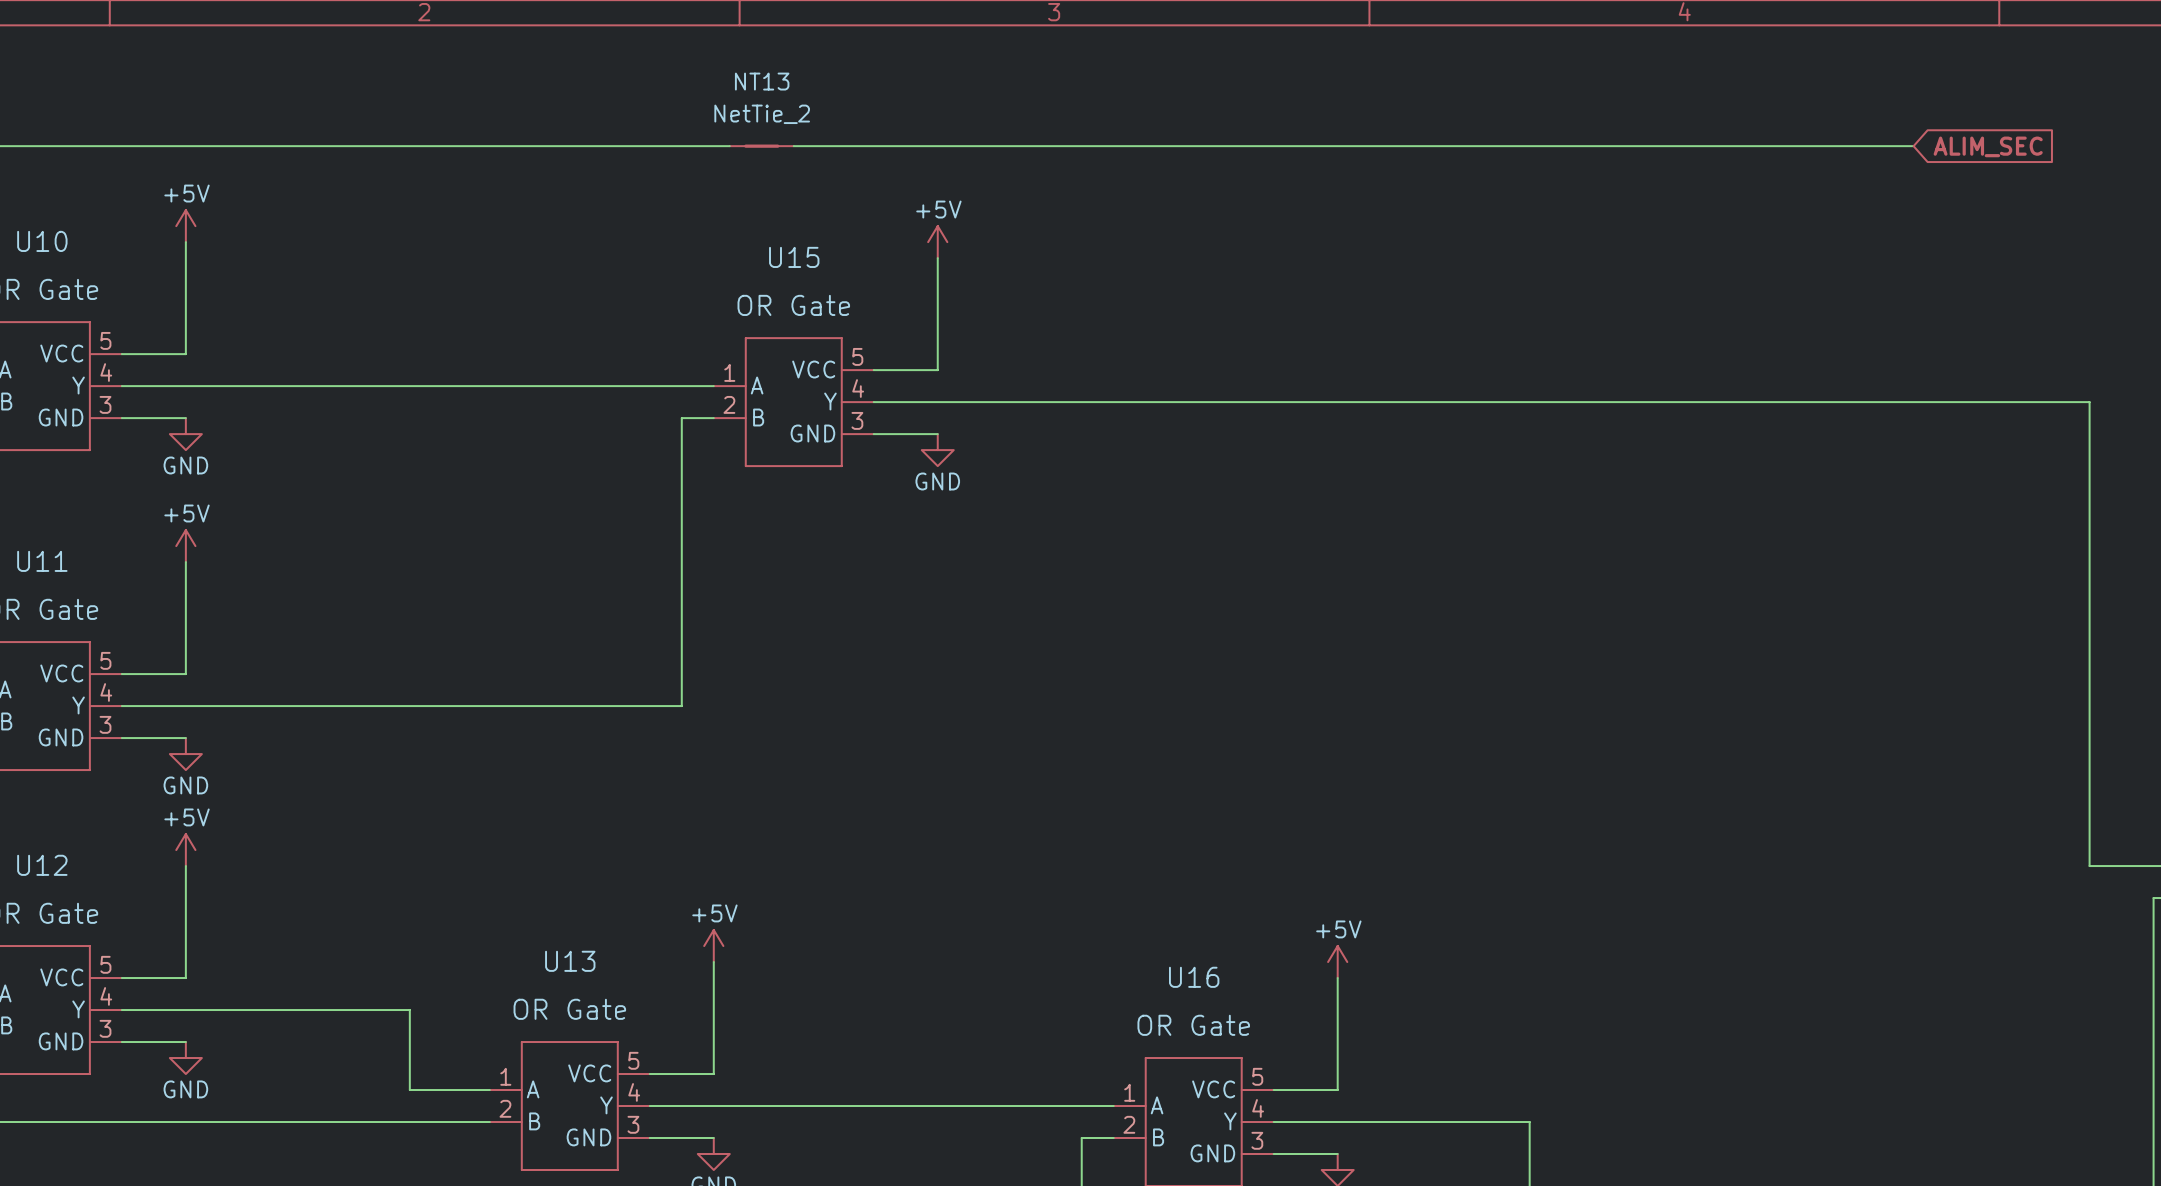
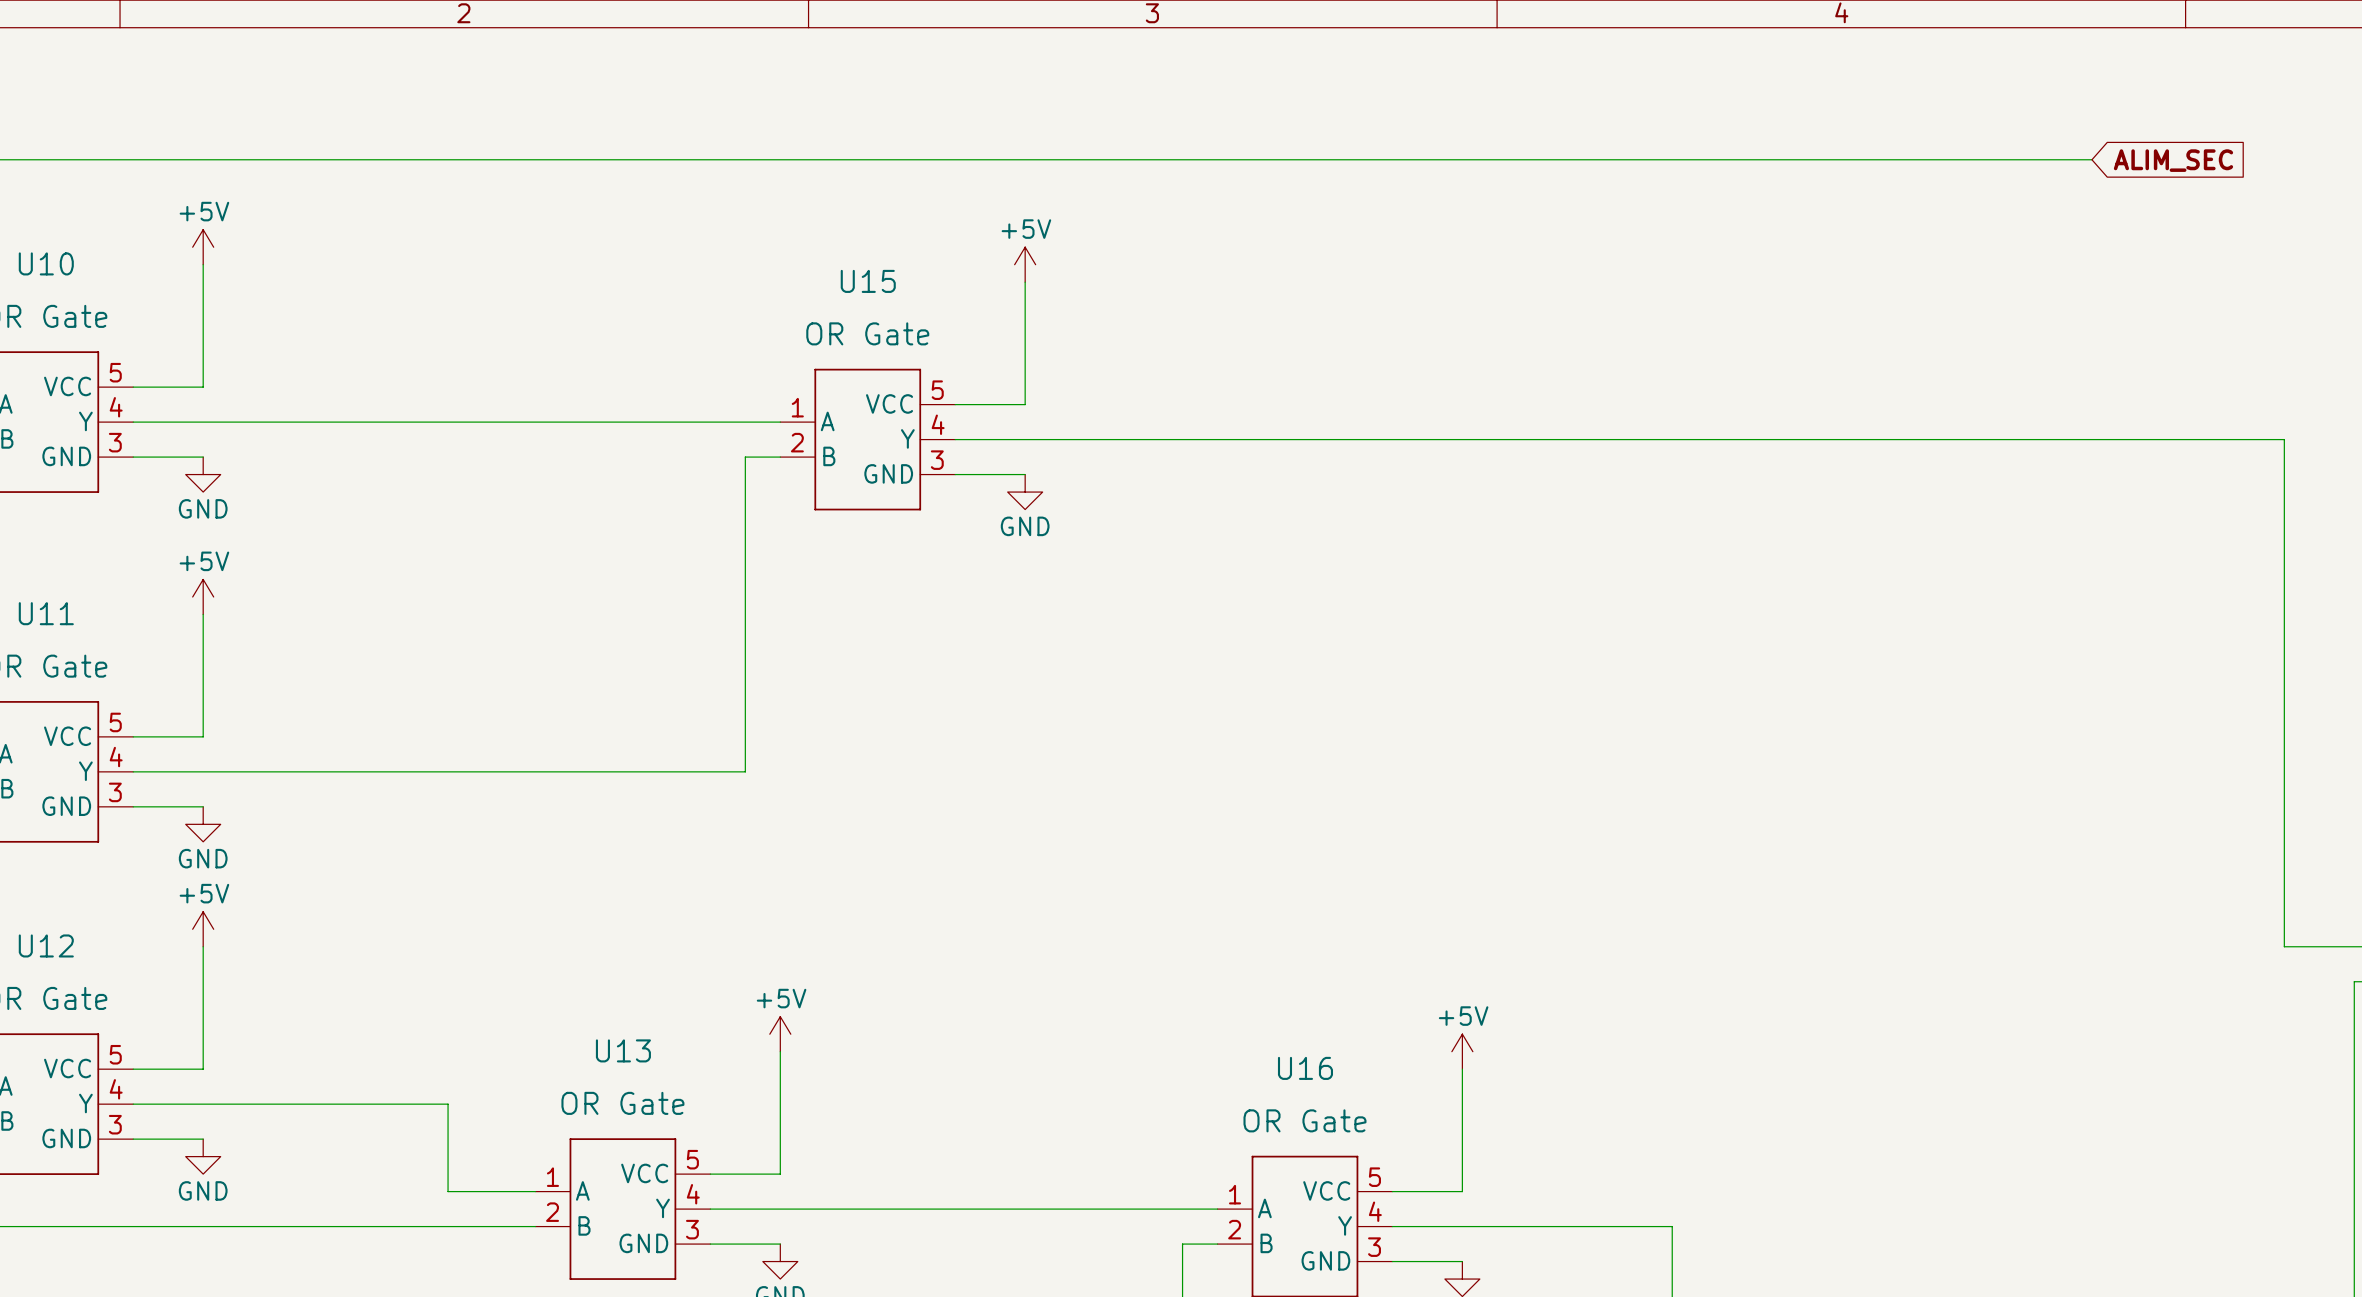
NT13: NetTie_2 (761, 146) -> none

